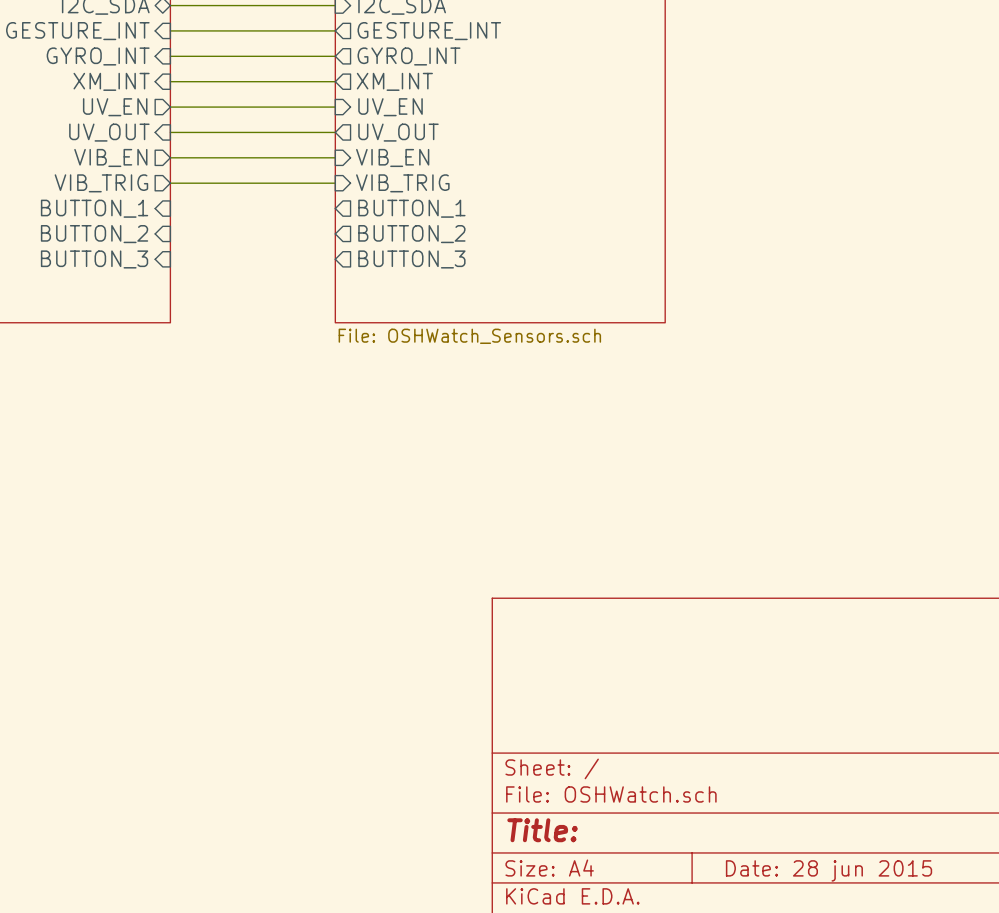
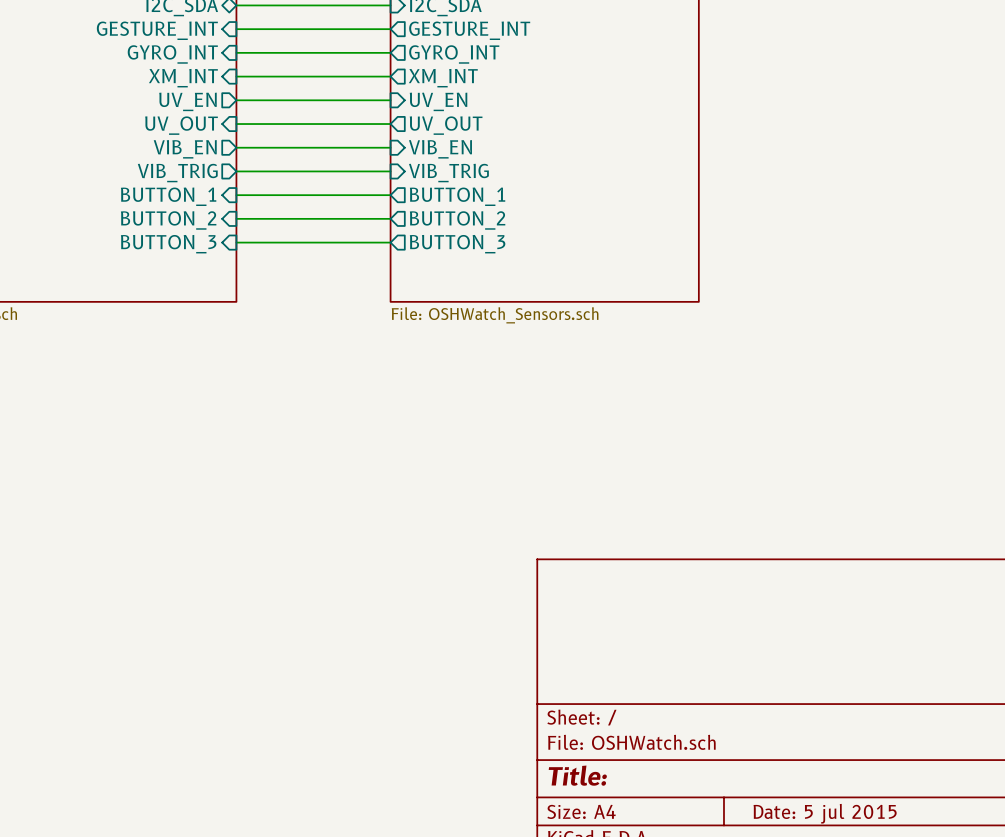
wire: none -> (236, 195) (390, 195)
wire: none -> (236, 218) (390, 218)
wire: none -> (236, 242) (390, 242)
title block: Date: 28 jun 2015 (829, 870) -> Date: 5 jul 2015 (825, 813)

